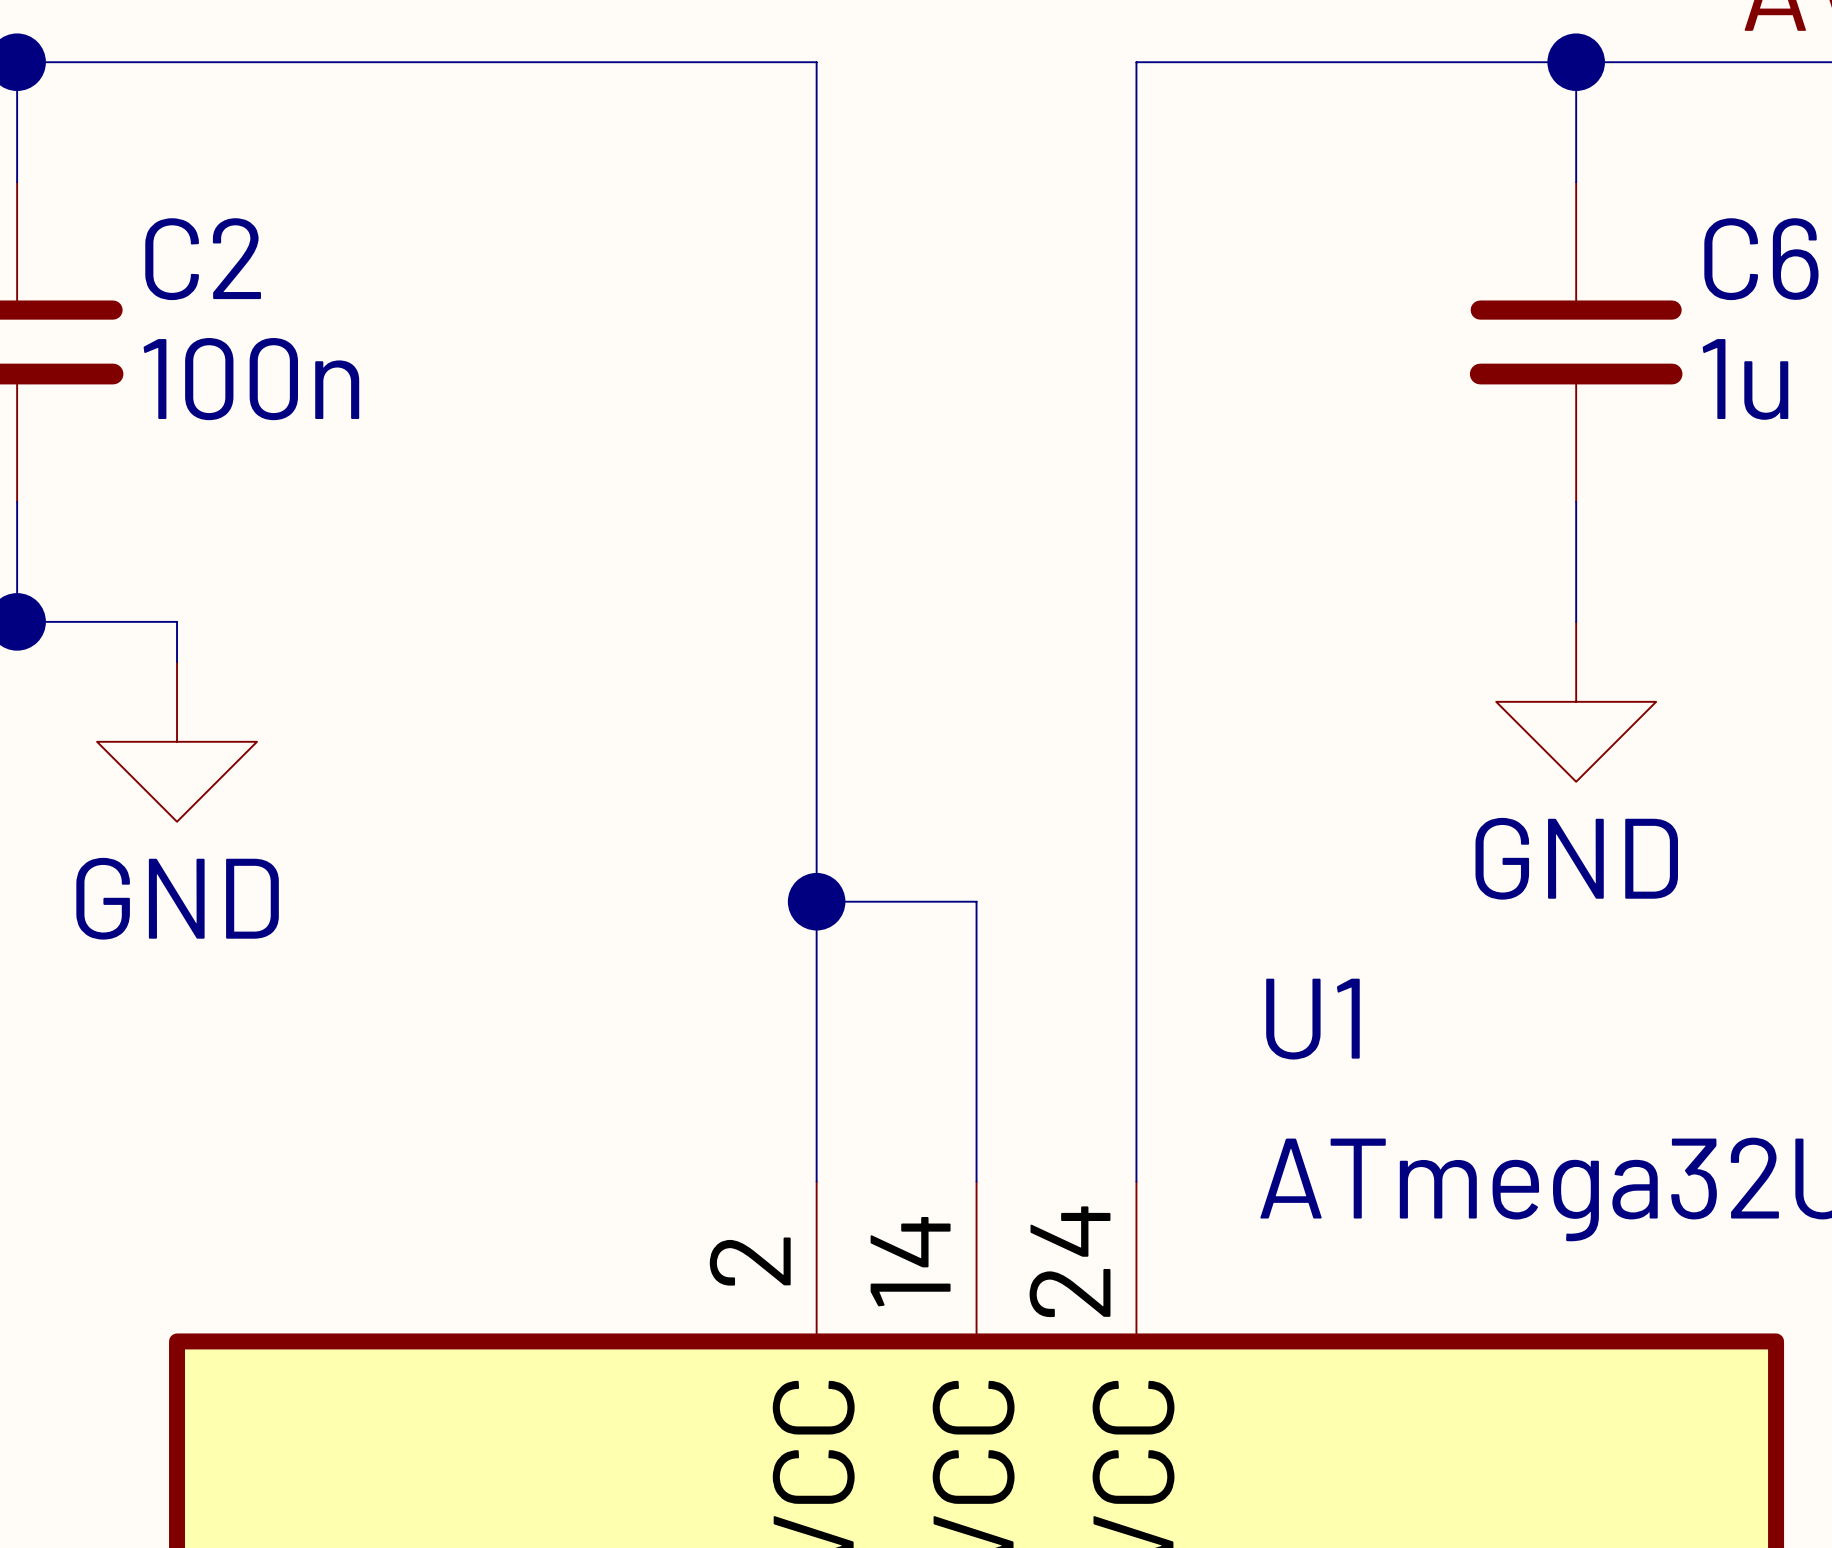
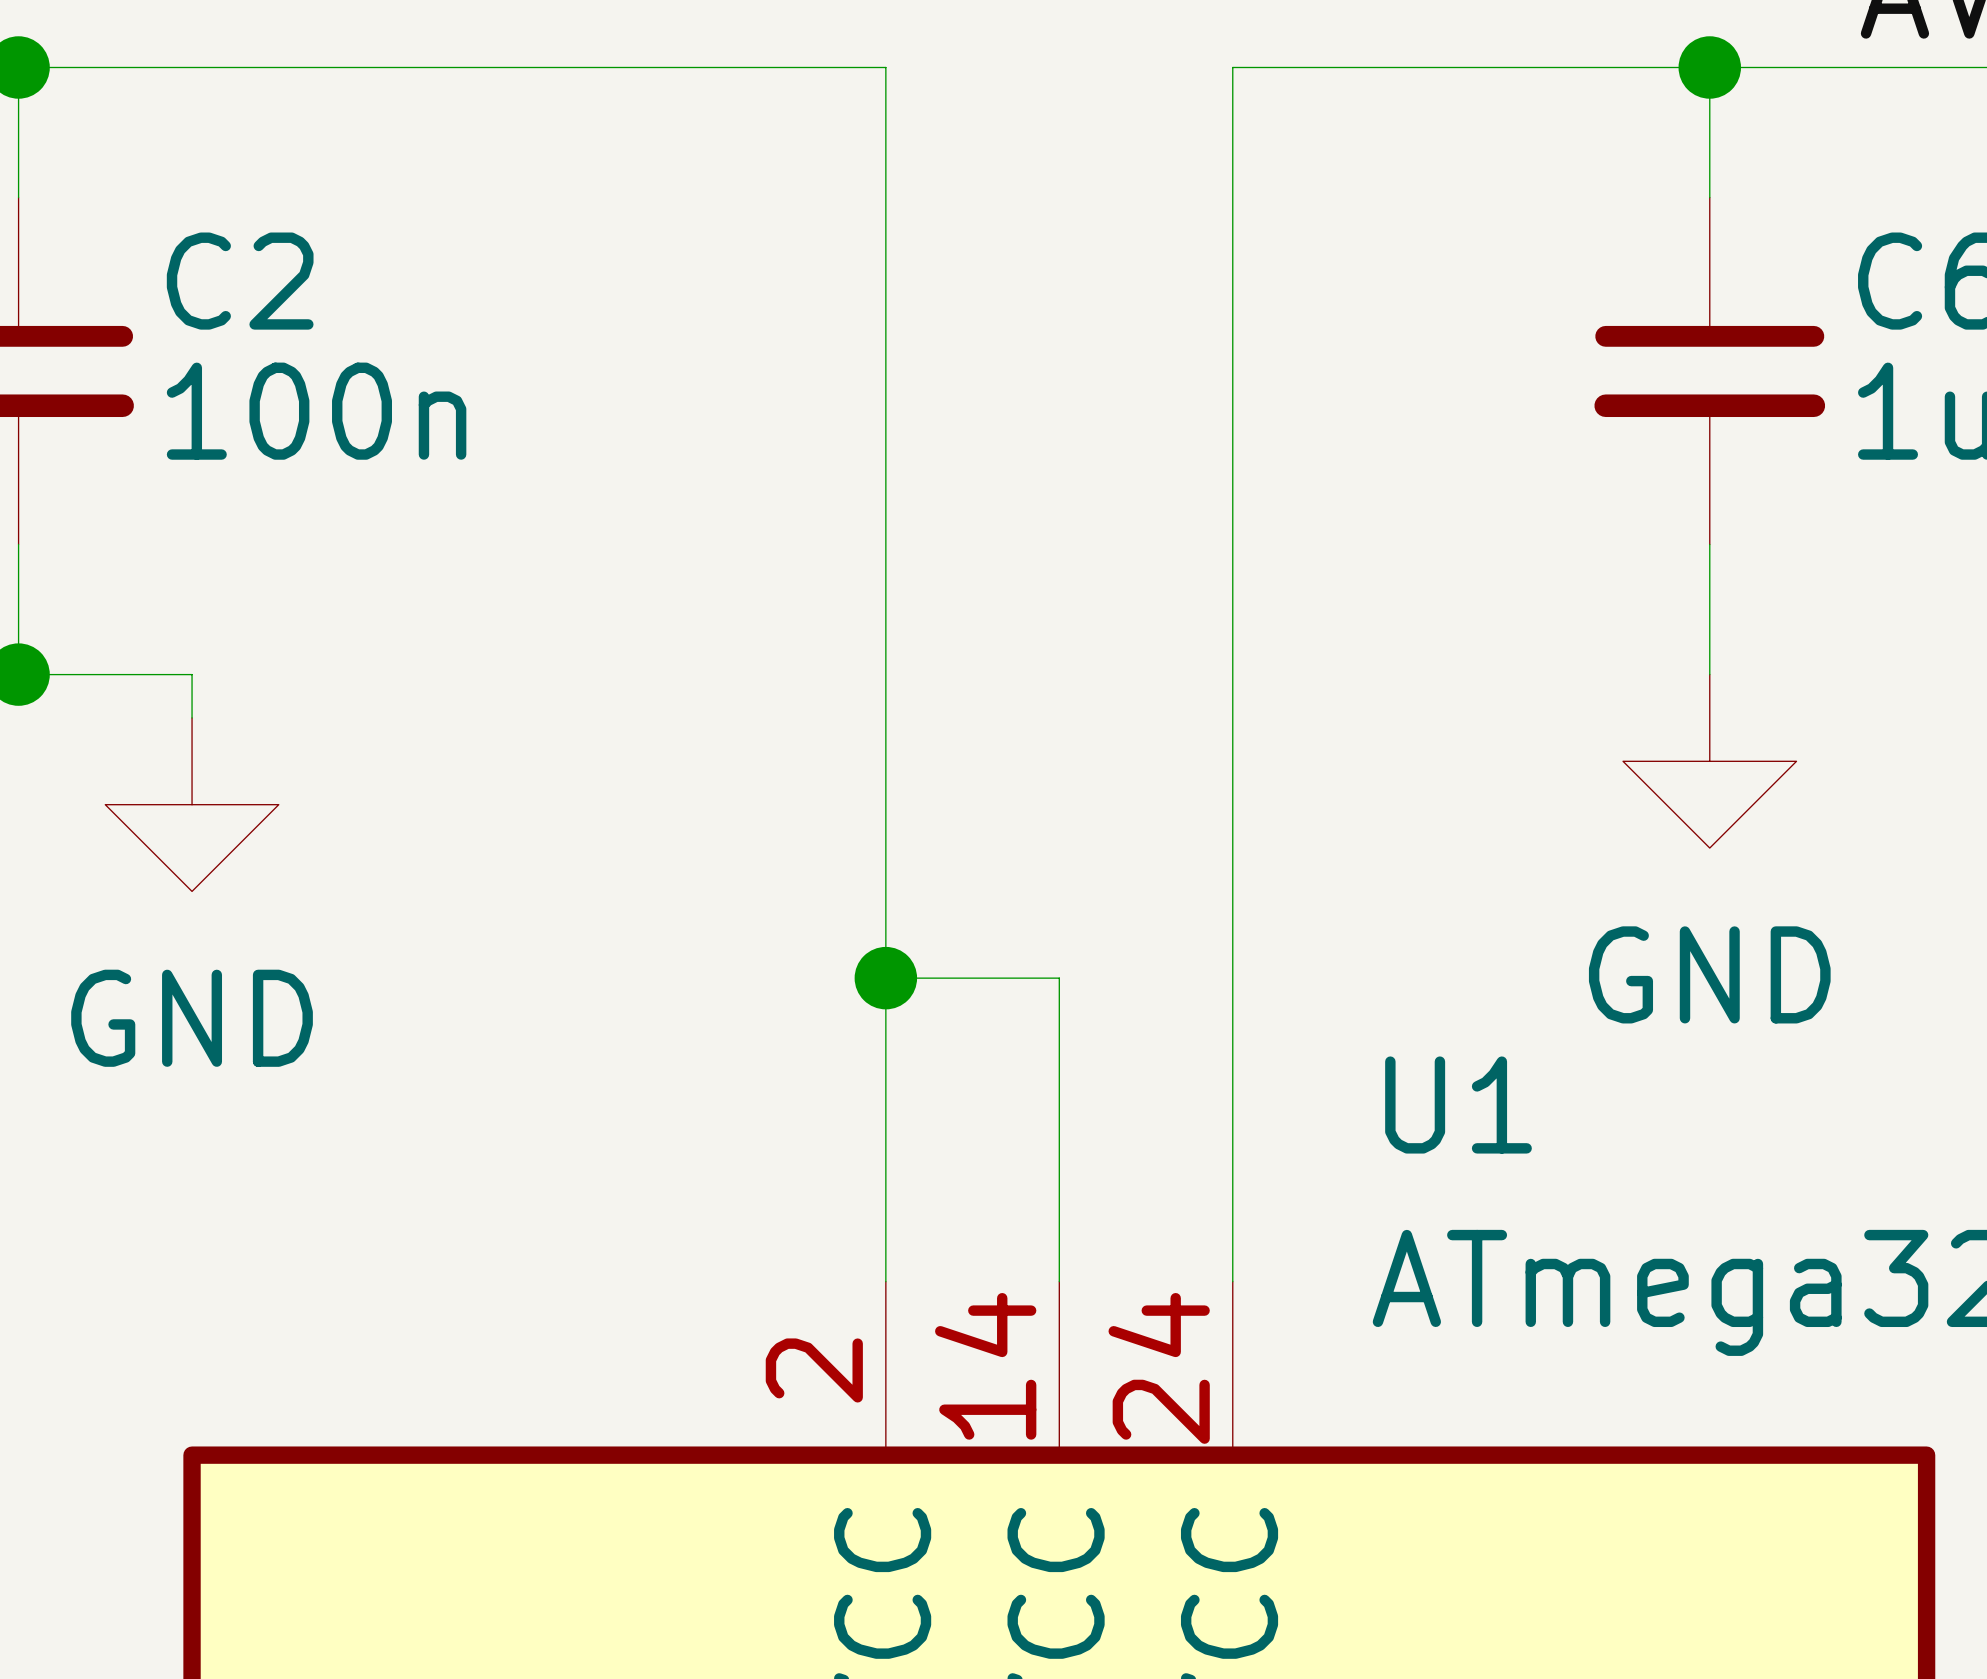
power symbol text position: GND (1576, 858) -> GND (1709, 974)
power symbol text position: GND (177, 898) -> GND (192, 1018)

